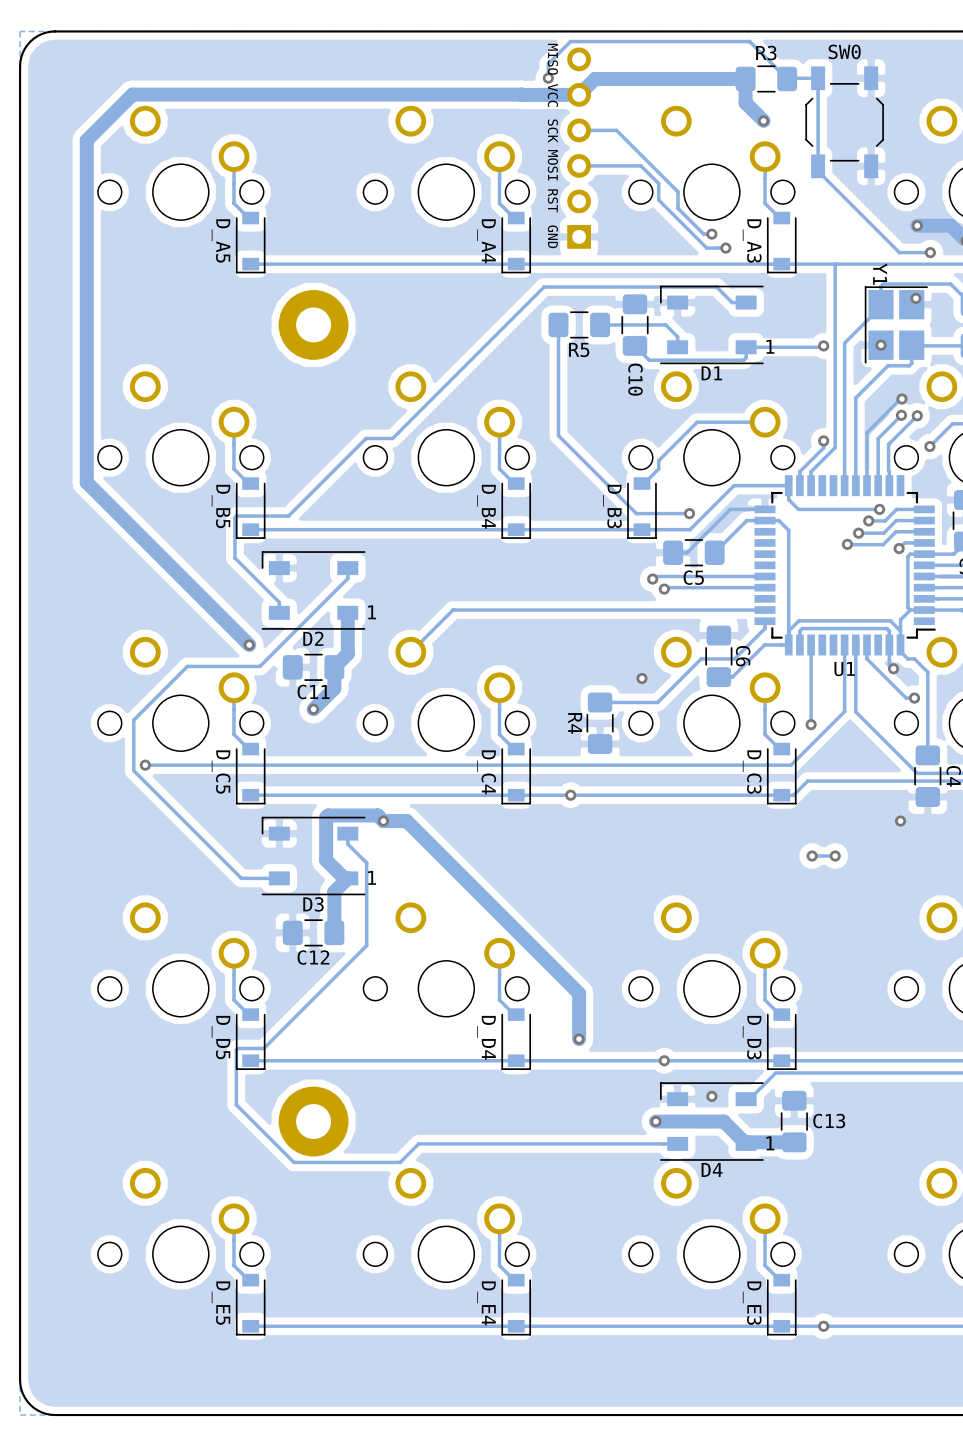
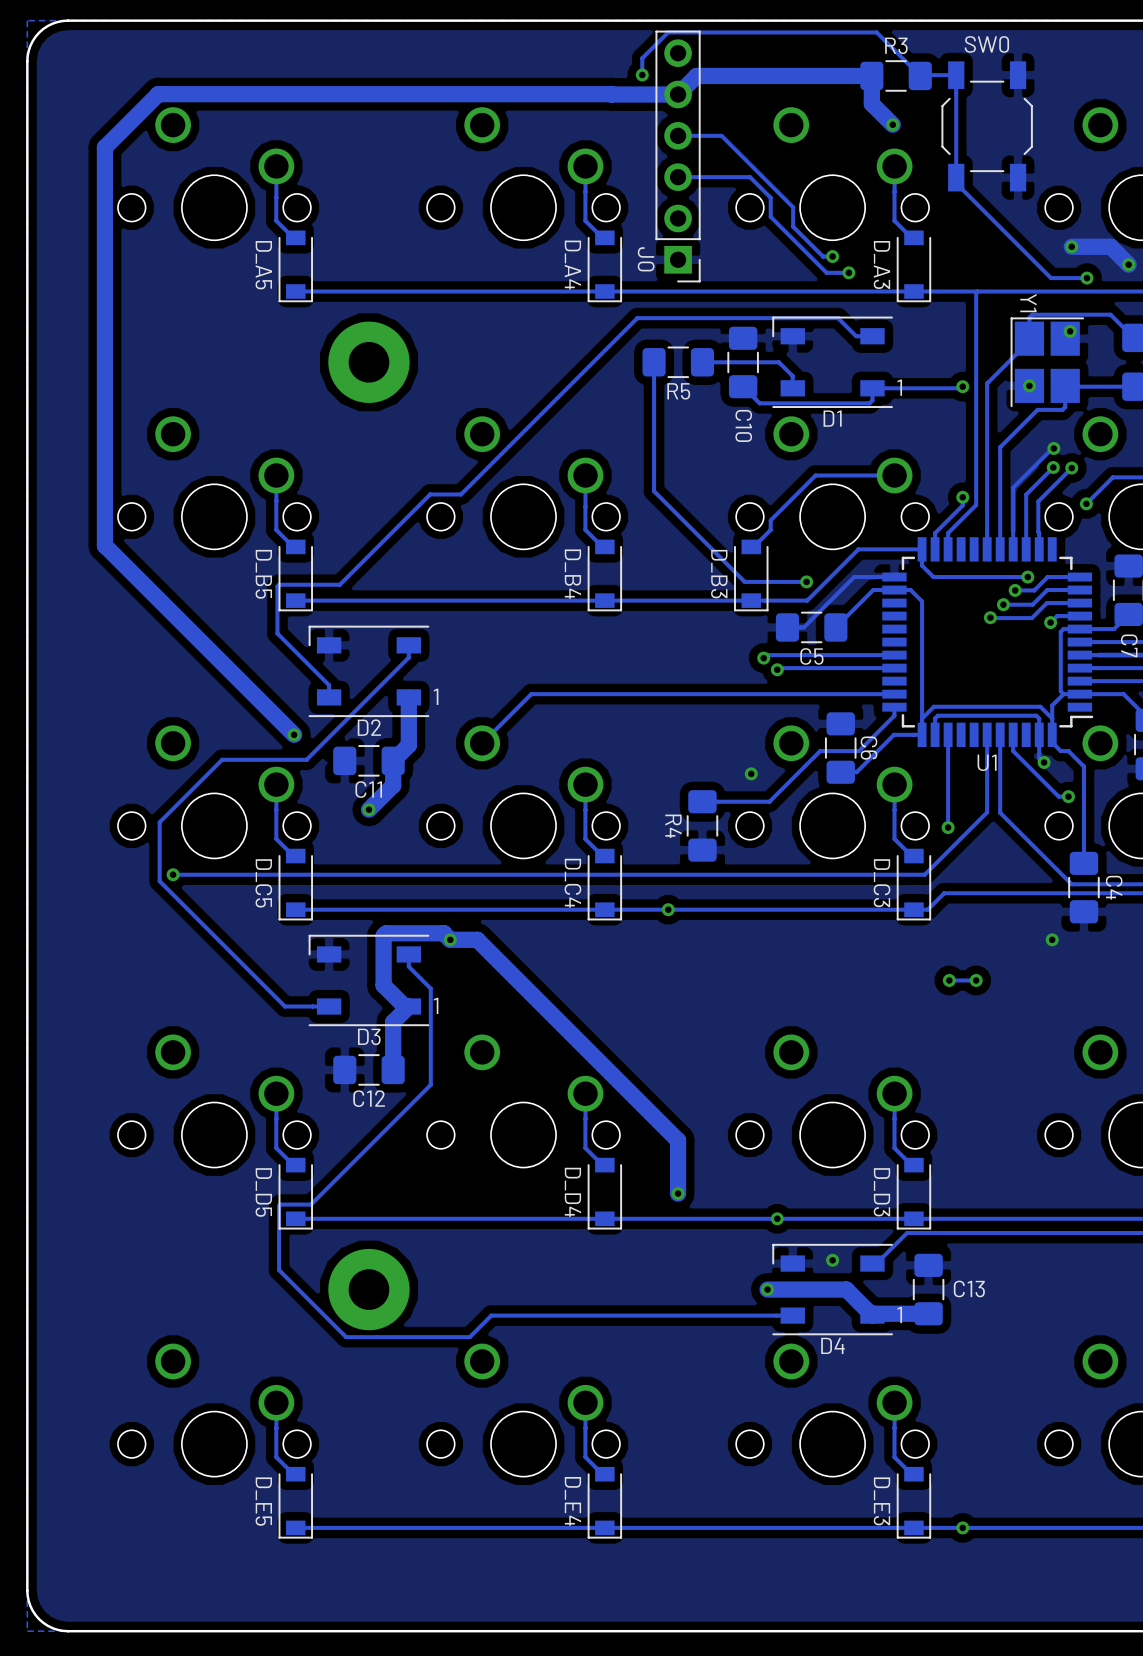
text: MISO (552, 59) -> none
text: VCC (552, 95) -> none
text: SCK (552, 131) -> none
J0 side: top (579, 148) -> bottom (678, 156)
text: MOSI (552, 165) -> none
text: RST (552, 200) -> none
text: GND (552, 236) -> none

